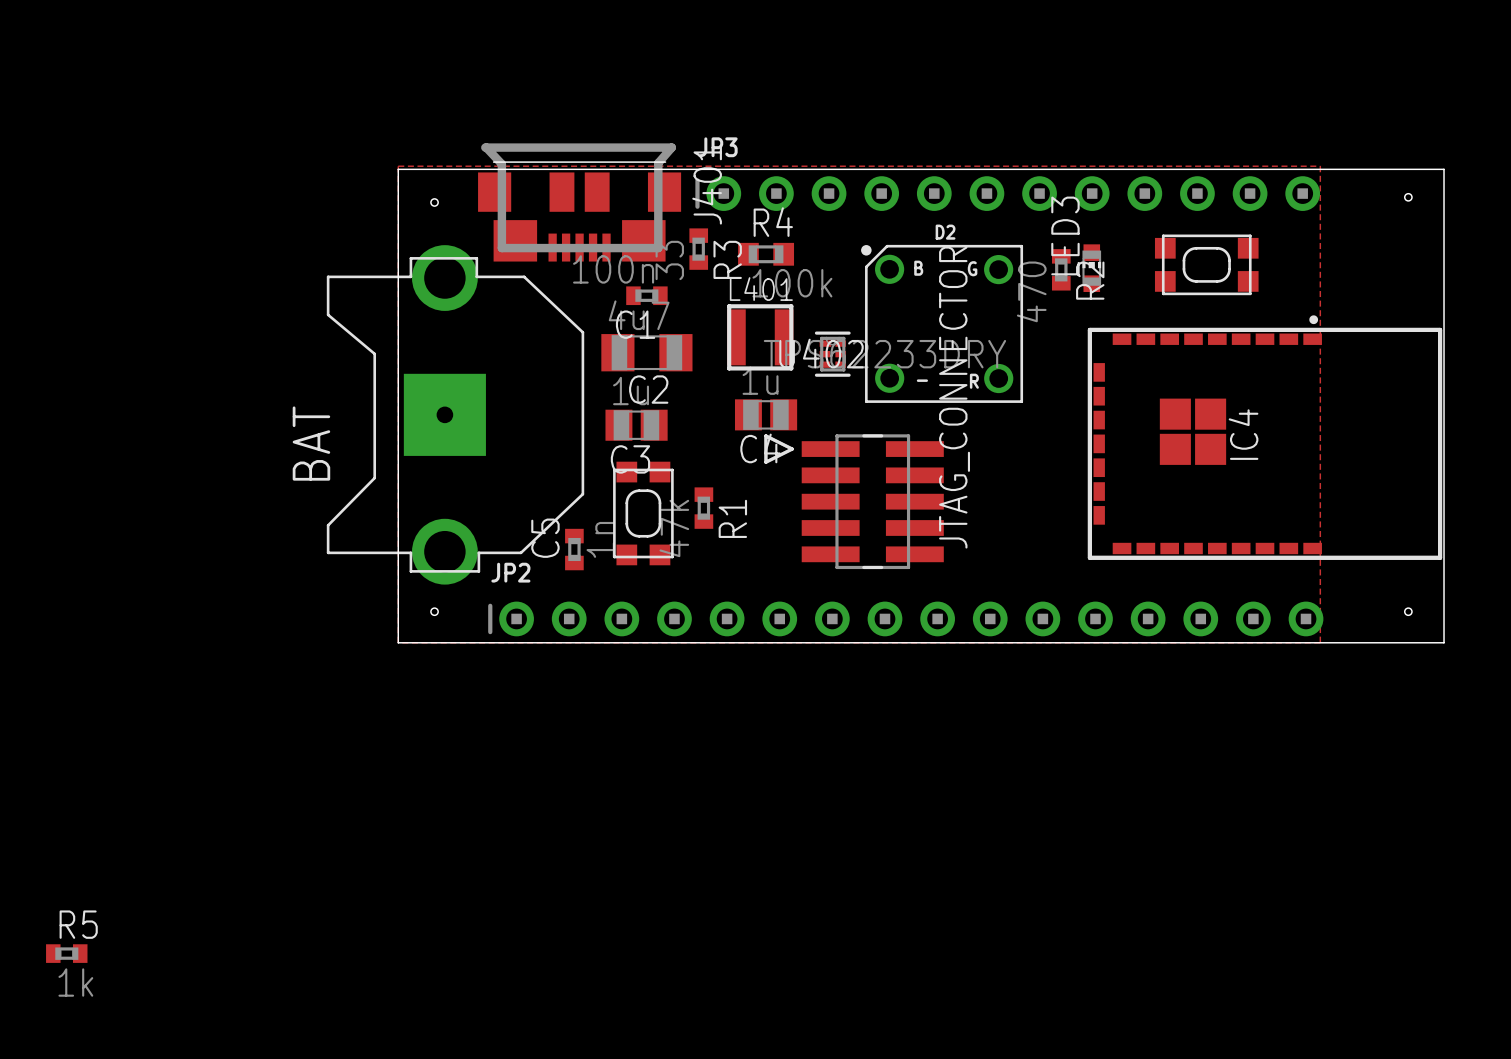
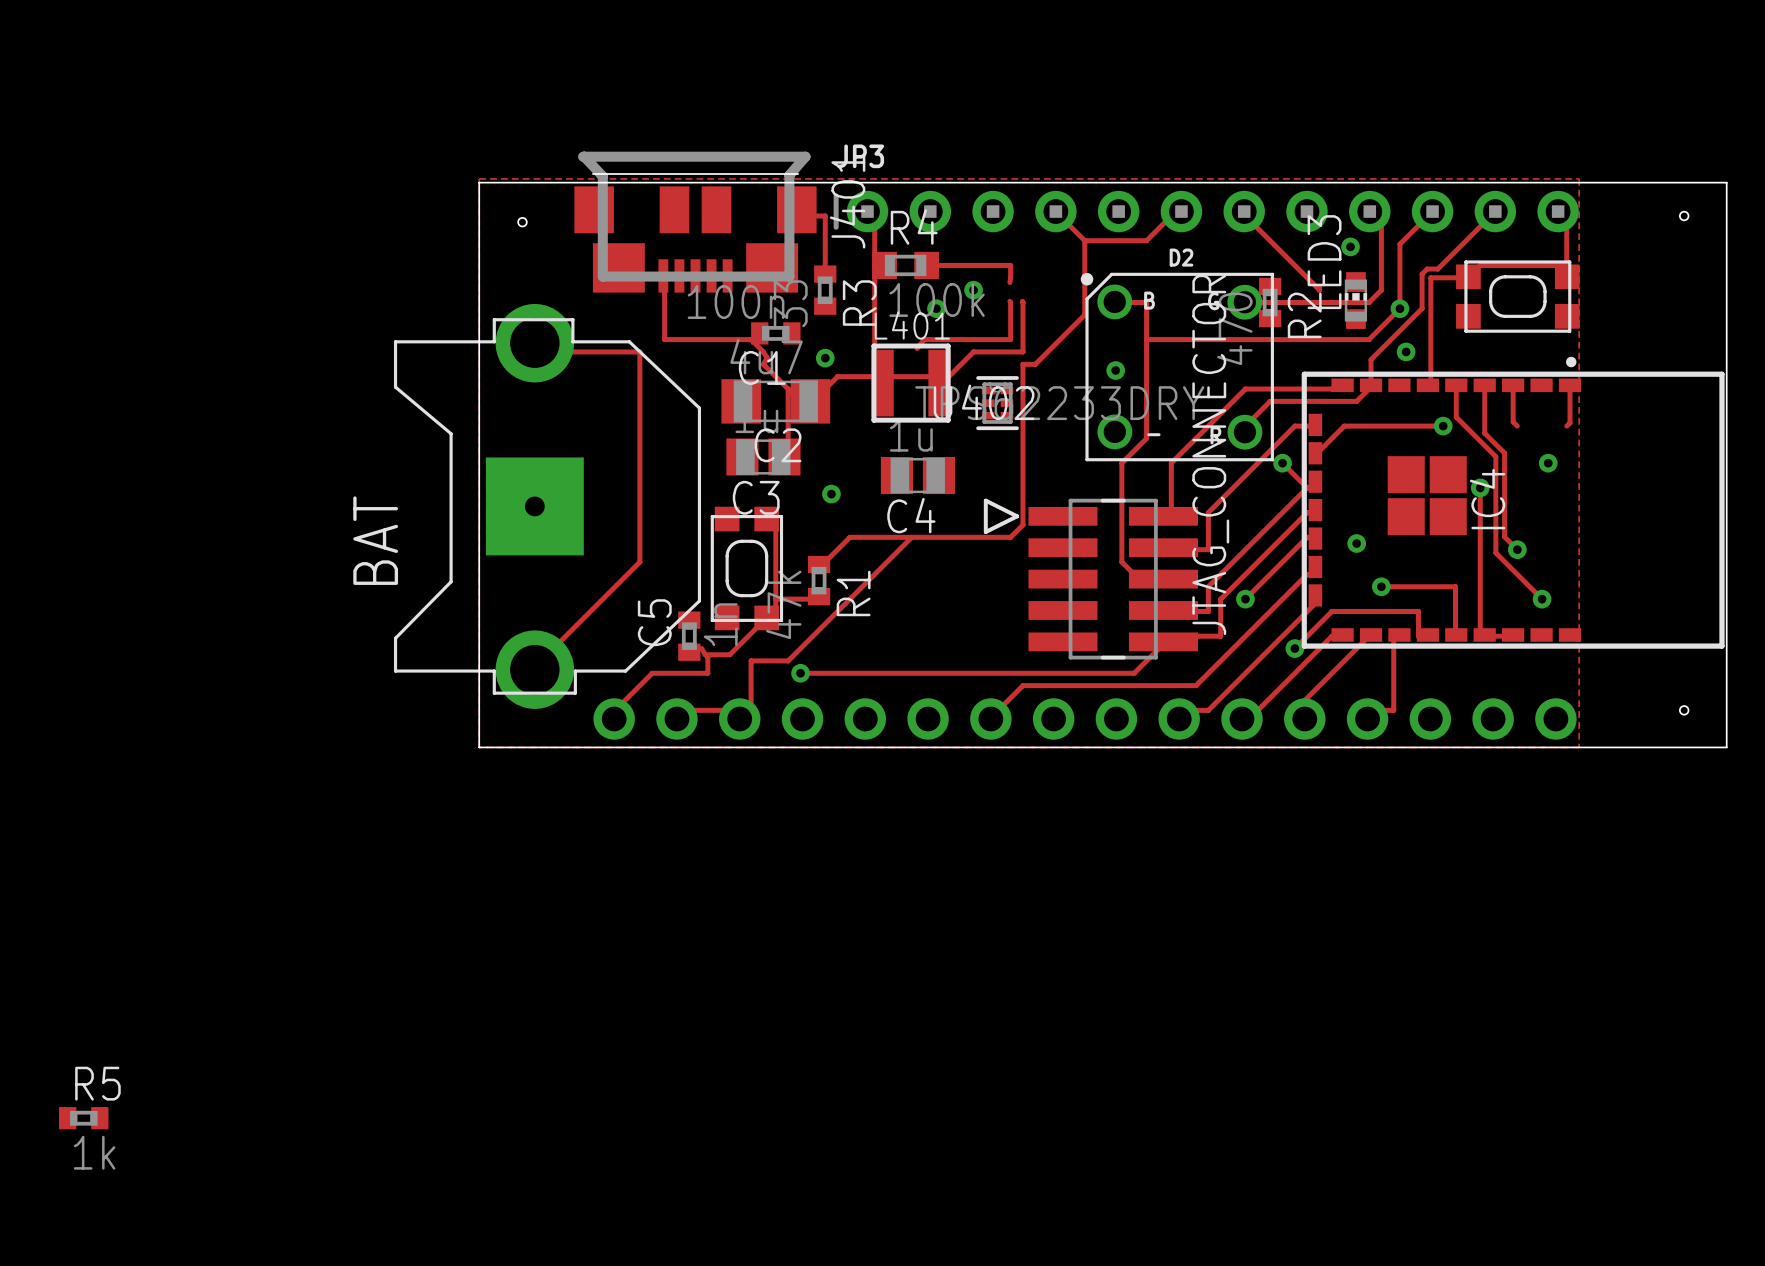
track: none -> (796, 209) (800, 216) (825, 216) (825, 277)
track: none -> (867, 211) (874, 216) (874, 376)
track: none -> (1055, 211) (1084, 240)
track: none -> (1181, 211) (1171, 216) (1146, 240) (1084, 240)
track: none -> (1244, 211) (1245, 216) (1319, 290) (1319, 286)
track: none -> (1369, 211) (1381, 216) (1381, 290) (1369, 302) (1244, 302)
track: none -> (1495, 211) (1437, 269) (1427, 269) (1422, 274) (1422, 308) (1371, 359) (1371, 385) (1356, 401) (1270, 401) (1245, 426) (1244, 432)
track: none -> (1558, 211) (1566, 216) (1566, 265)
track: none -> (1430, 216) (1432, 211) (1399, 244) (1399, 308) (1369, 339) (1146, 339)
track: none -> (1084, 240) (1084, 314) (1035, 364) (1023, 364) (1023, 524) (1010, 537) (849, 537) (825, 562) (819, 564)
via: none -> (1350, 246)
track: none -> (926, 265) (1010, 265) (1009, 282)
track: none -> (1566, 265) (1480, 265) (1467, 277) (1430, 277) (1430, 389) (1427, 385)
track: none -> (663, 275) (664, 339) (751, 339) (767, 358) (763, 364) (800, 401) (812, 401) (837, 376) (948, 376) (973, 351) (1023, 351) (1022, 301)
R3 position: (698, 249) -> (825, 290)
R4 position: (766, 254) -> (905, 265)
via: none -> (973, 290)
part position: (1206, 264) -> (1517, 296)
track: none -> (1009, 301) (1010, 339) (924, 339) (917, 348)
LED3 position: (1091, 268) -> (1355, 300)
track: none -> (1114, 301) (1146, 302) (1146, 438) (1121, 463) (1121, 562) (1134, 574) (1158, 574) (1163, 579)
via: none -> (936, 308)
via: none -> (1399, 308)
track: none -> (534, 343) (541, 351) (639, 351) (639, 562) (541, 660) (534, 669)
via: none -> (1406, 351)
via: none -> (825, 358)
D2 position: (942, 323) -> (1177, 367)
via: none -> (1115, 370)
track: none -> (1342, 385) (1331, 389) (1245, 389) (1171, 463) (1171, 512) (1163, 516)
track: none -> (1513, 385) (1513, 421) (1517, 426)
track: none -> (1569, 385) (1569, 422) (1566, 426)
track: none -> (788, 389) (788, 450) (784, 457)
track: none -> (1455, 389) (1456, 385) (1456, 417) (1495, 456) (1495, 552) (1542, 599)
track: none -> (1492, 389) (1484, 385) (1484, 433) (1504, 453) (1504, 536) (1517, 549)
track: none -> (1315, 424) (1319, 426) (1294, 426) (1208, 512) (1208, 549) (1171, 549) (1163, 547)
track: none -> (1443, 426) (1344, 426) (1315, 453)
via: none -> (1443, 426)
track: none -> (1282, 463) (1307, 487)
via: none -> (1282, 463)
via: none -> (1548, 463)
BAT position: (455, 414) -> (547, 506)
C3 position: (636, 425) -> (763, 457)
track: none -> (1307, 487) (1208, 586) (1208, 611) (1163, 610)
track: none -> (1480, 487) (1480, 636) (1513, 634)
via: none -> (1480, 487)
via: none -> (831, 494)
track: none -> (1315, 510) (1319, 512) (1307, 512) (1220, 599) (1220, 636) (1171, 636) (1163, 641) (1134, 673) (800, 673)
track: none -> (766, 519) (775, 524) (775, 611) (766, 617) (729, 654) (705, 654)
track: none -> (911, 537) (788, 660) (751, 660) (751, 710) (739, 719) (738, 710) (676, 710) (676, 719)
track: none -> (1315, 538) (1319, 537) (1307, 537) (1245, 599)
via: none -> (1356, 543)
via: none -> (1517, 549)
track: none -> (1315, 566) (1319, 574) (1307, 574) (1196, 685) (1023, 685) (990, 719)
JTAG_CONNECTOR position: (854, 501) -> (1090, 579)
R1 position: (703, 508) -> (819, 580)
track: none -> (1381, 586) (1455, 586) (1456, 634)
via: none -> (1381, 586)
part position: (643, 513) -> (746, 568)
track: none -> (1315, 595) (1319, 599) (1208, 710) (1183, 710) (1179, 719)
track: none -> (819, 596) (812, 599) (775, 599)
via: none -> (1245, 599)
via: none -> (1542, 599)
track: none -> (1342, 634) (1331, 636) (1257, 710) (1245, 710) (1241, 719)
track: none -> (1371, 634) (1294, 710) (1304, 719)
track: none -> (1399, 634) (1393, 636) (1393, 710) (1369, 710) (1367, 719)
track: none -> (1427, 634) (1418, 636) (1418, 611) (1331, 611) (1294, 648)
track: none -> (701, 648) (705, 654)
via: none -> (1294, 648)
track: none -> (705, 654) (707, 657) (707, 673) (652, 673) (614, 711) (614, 719)
via: none -> (800, 673)
hole: (434, 611) -> none
JP2 side: top (905, 618) -> bottom (1085, 719)

